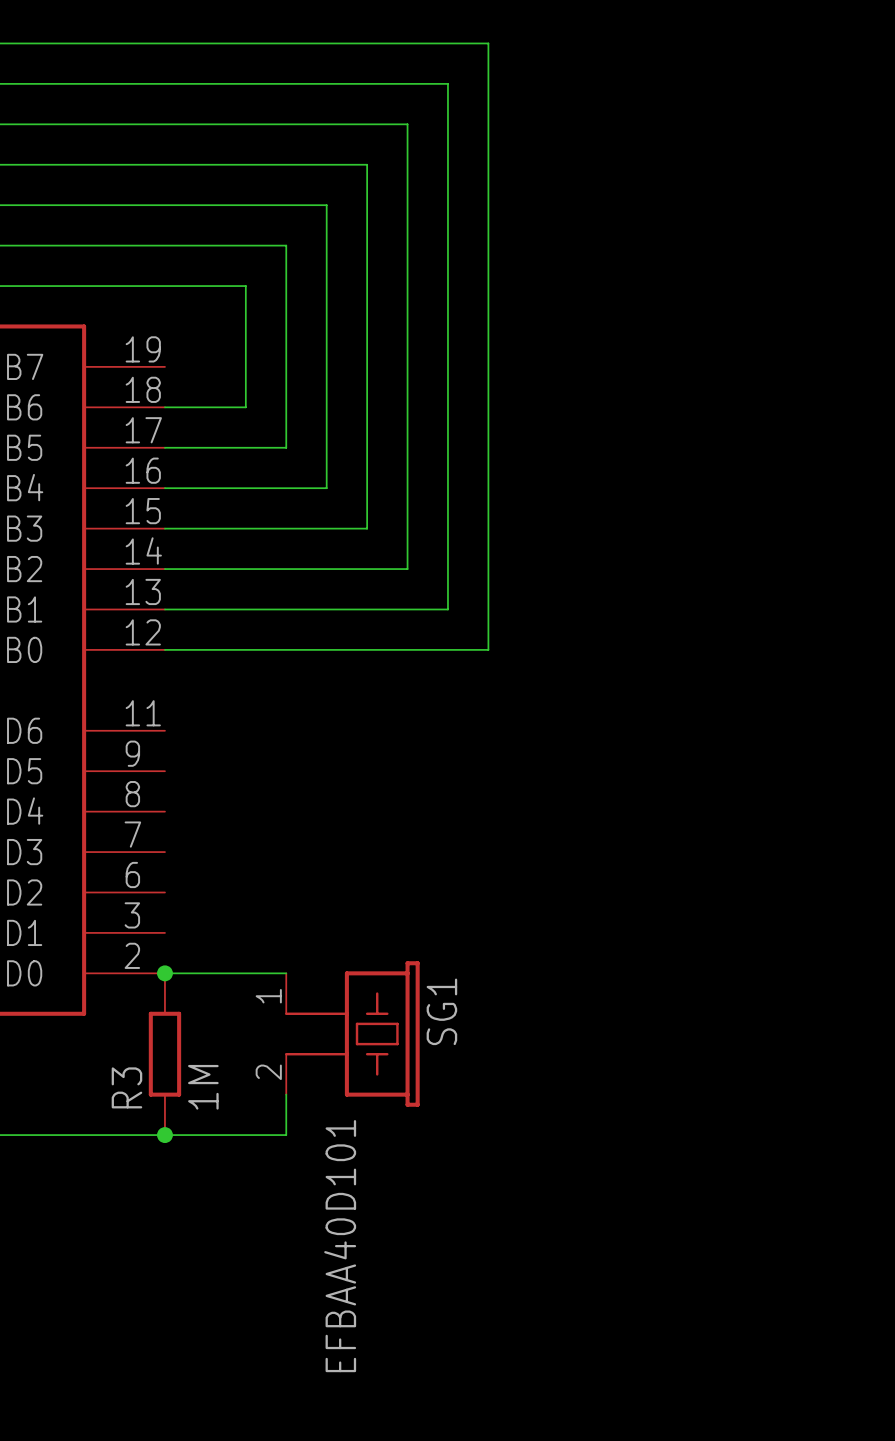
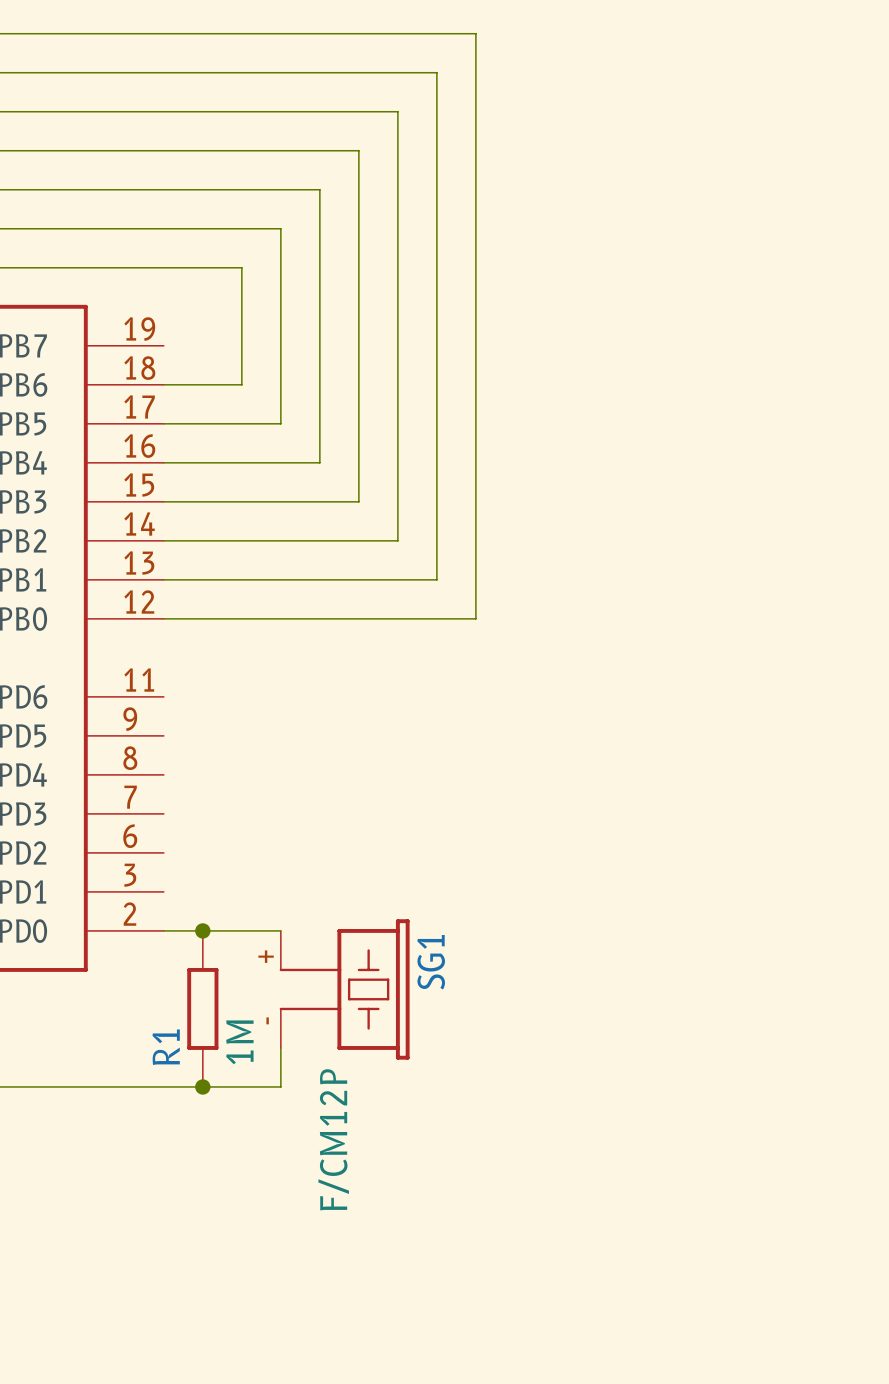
junction position: (164, 973) -> (202, 930)
SG1 pin number: 1 (268, 996) -> + (266, 956)
R3: 1M (164, 1054) -> none
R1: none -> 1M (202, 1008)
SG1 pin number: 2 (268, 1072) -> - (267, 1020)
junction position: (164, 1135) -> (202, 1086)
SG1 value: EFBAA40D101 (340, 1246) -> F/CM12P (333, 1139)

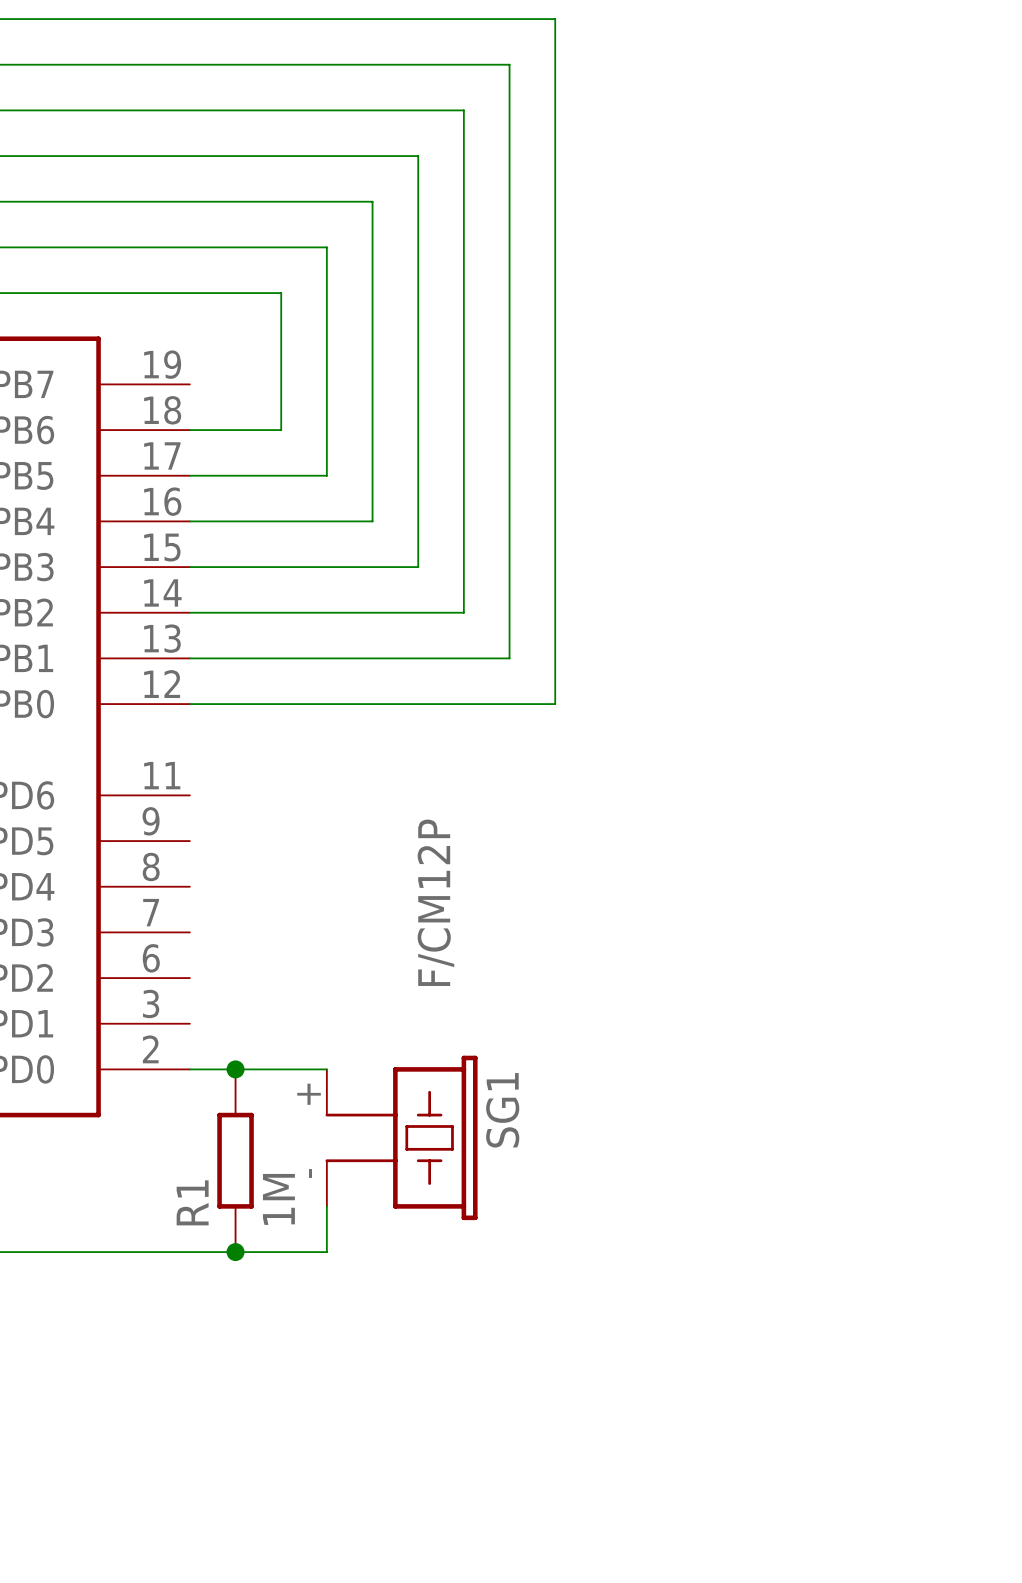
SG1 value position: F/CM12P (333, 1139) -> F/CM12P (435, 902)

